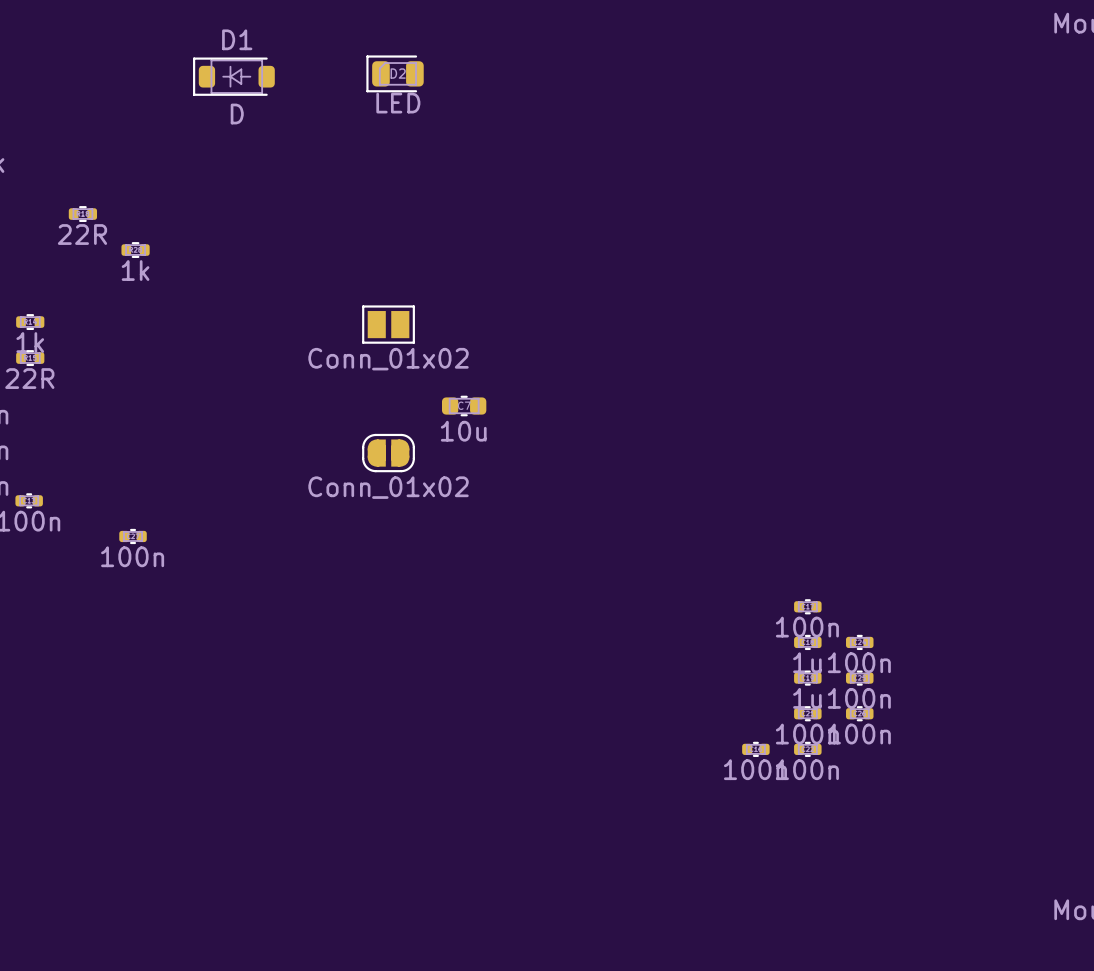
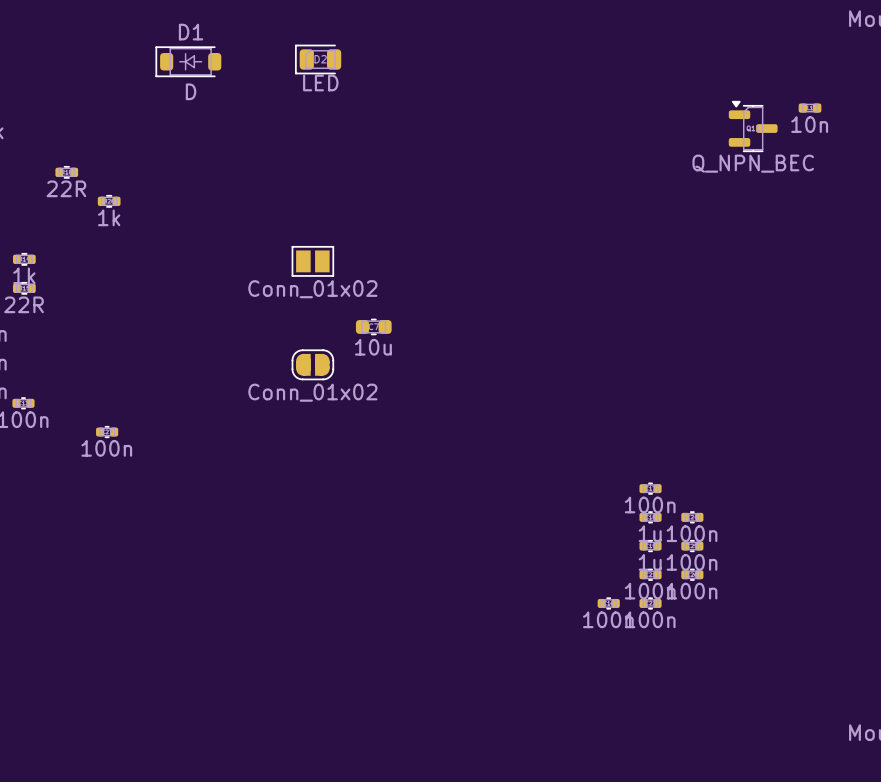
part: none -> 10n (810, 108)
part: none -> Q_NPN_BEC (753, 126)

